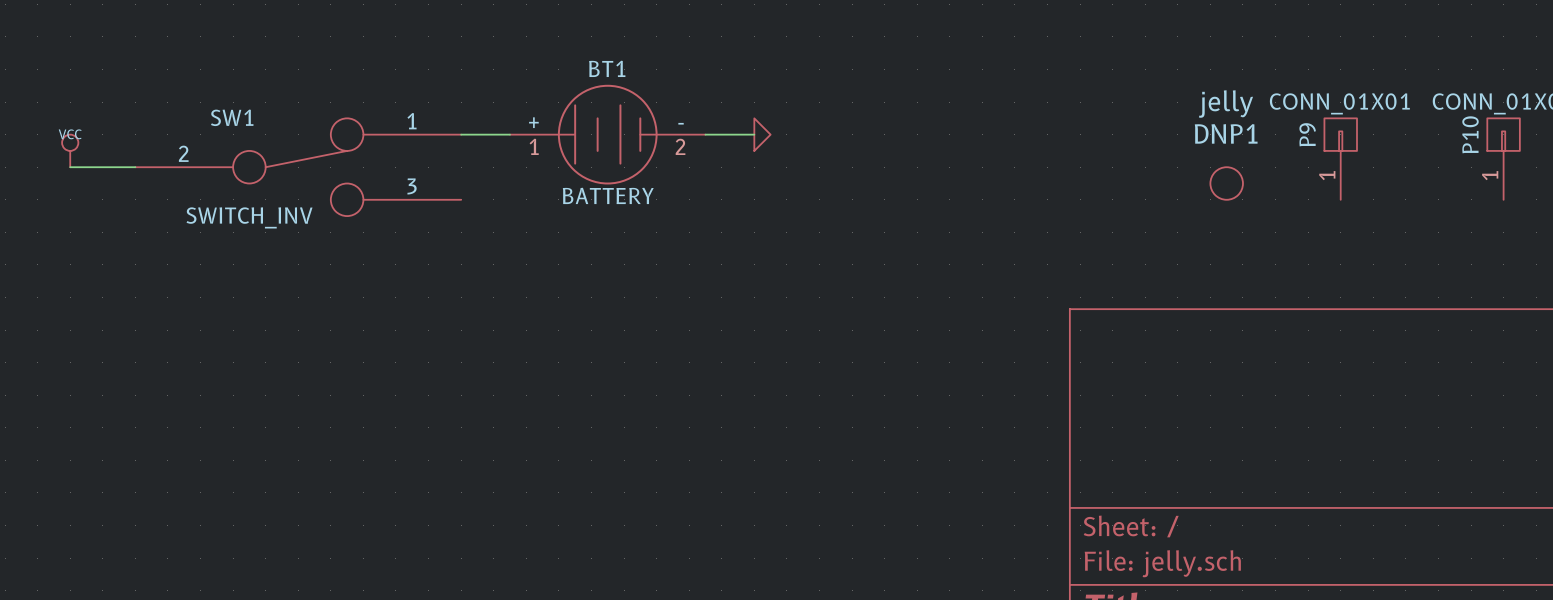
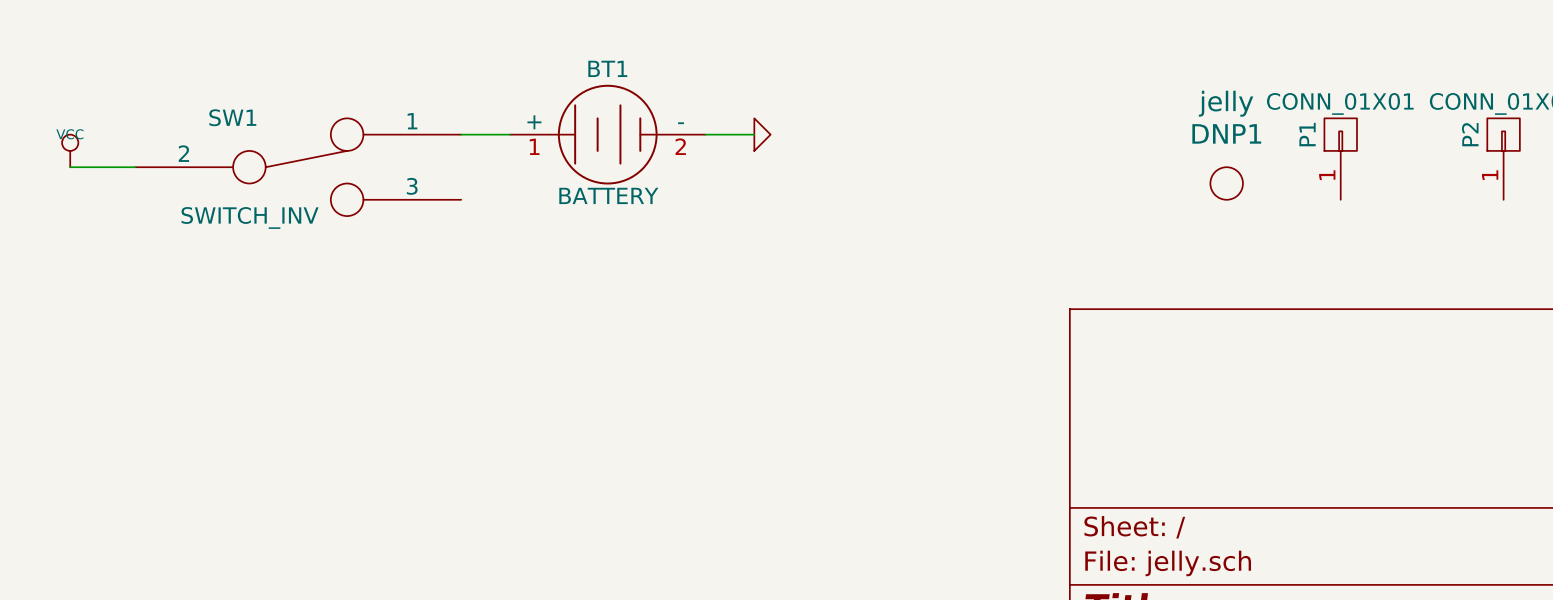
P9 name: P9 (1307, 134) -> P1 (1307, 134)
P10 name: P10 (1470, 134) -> P2 (1470, 134)

